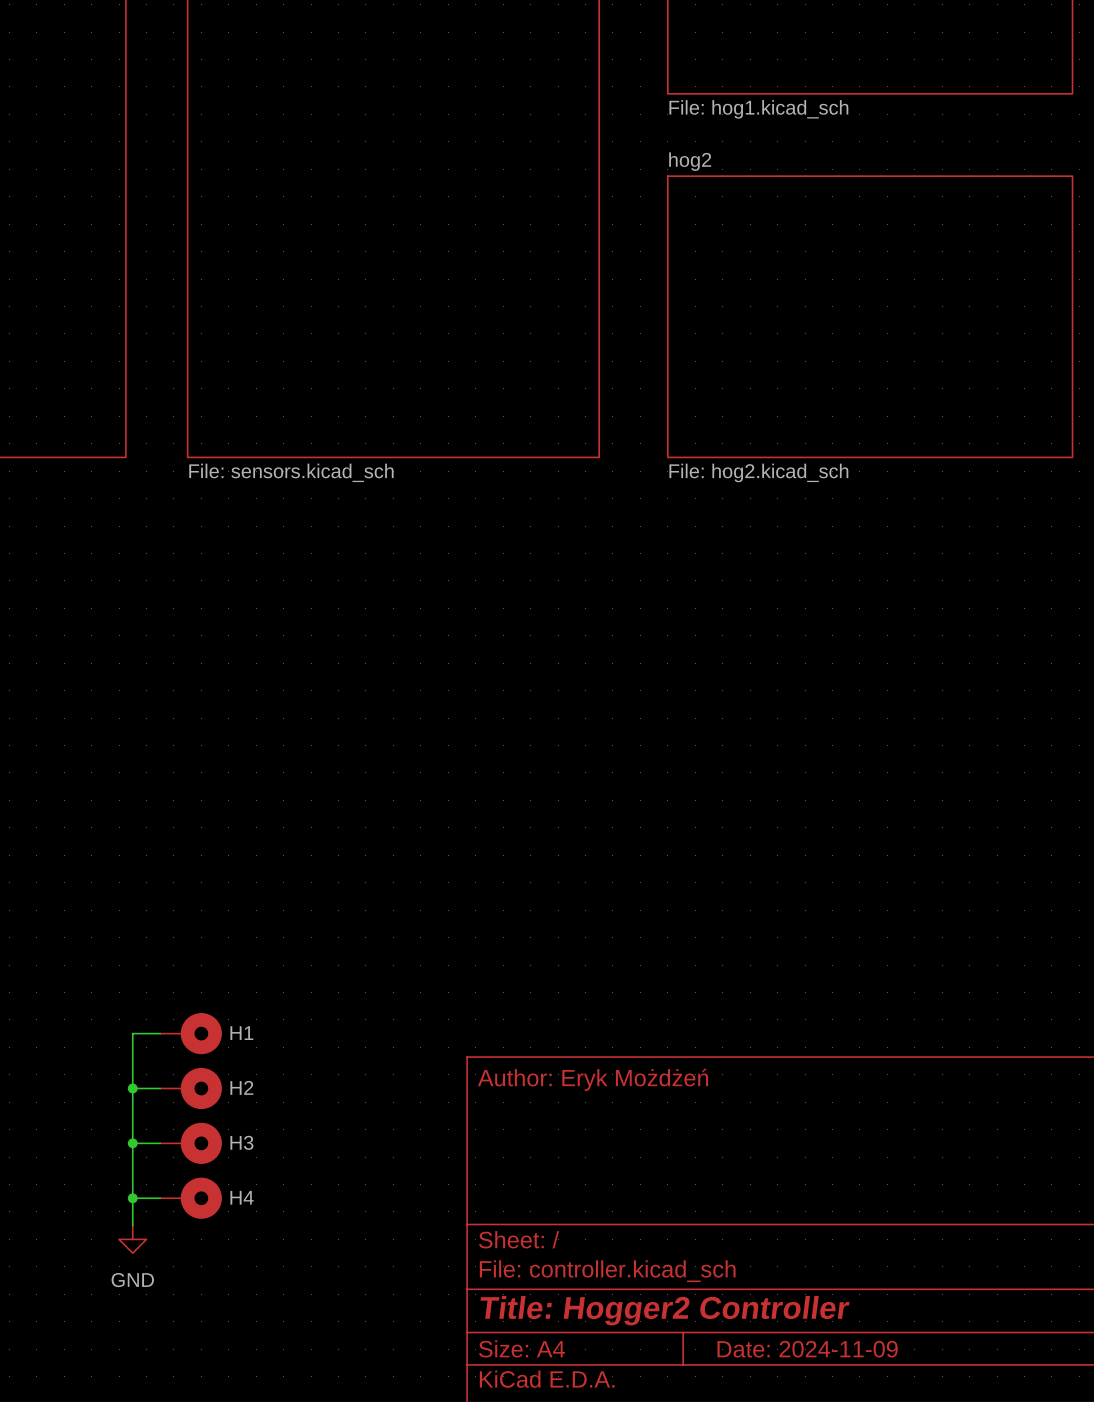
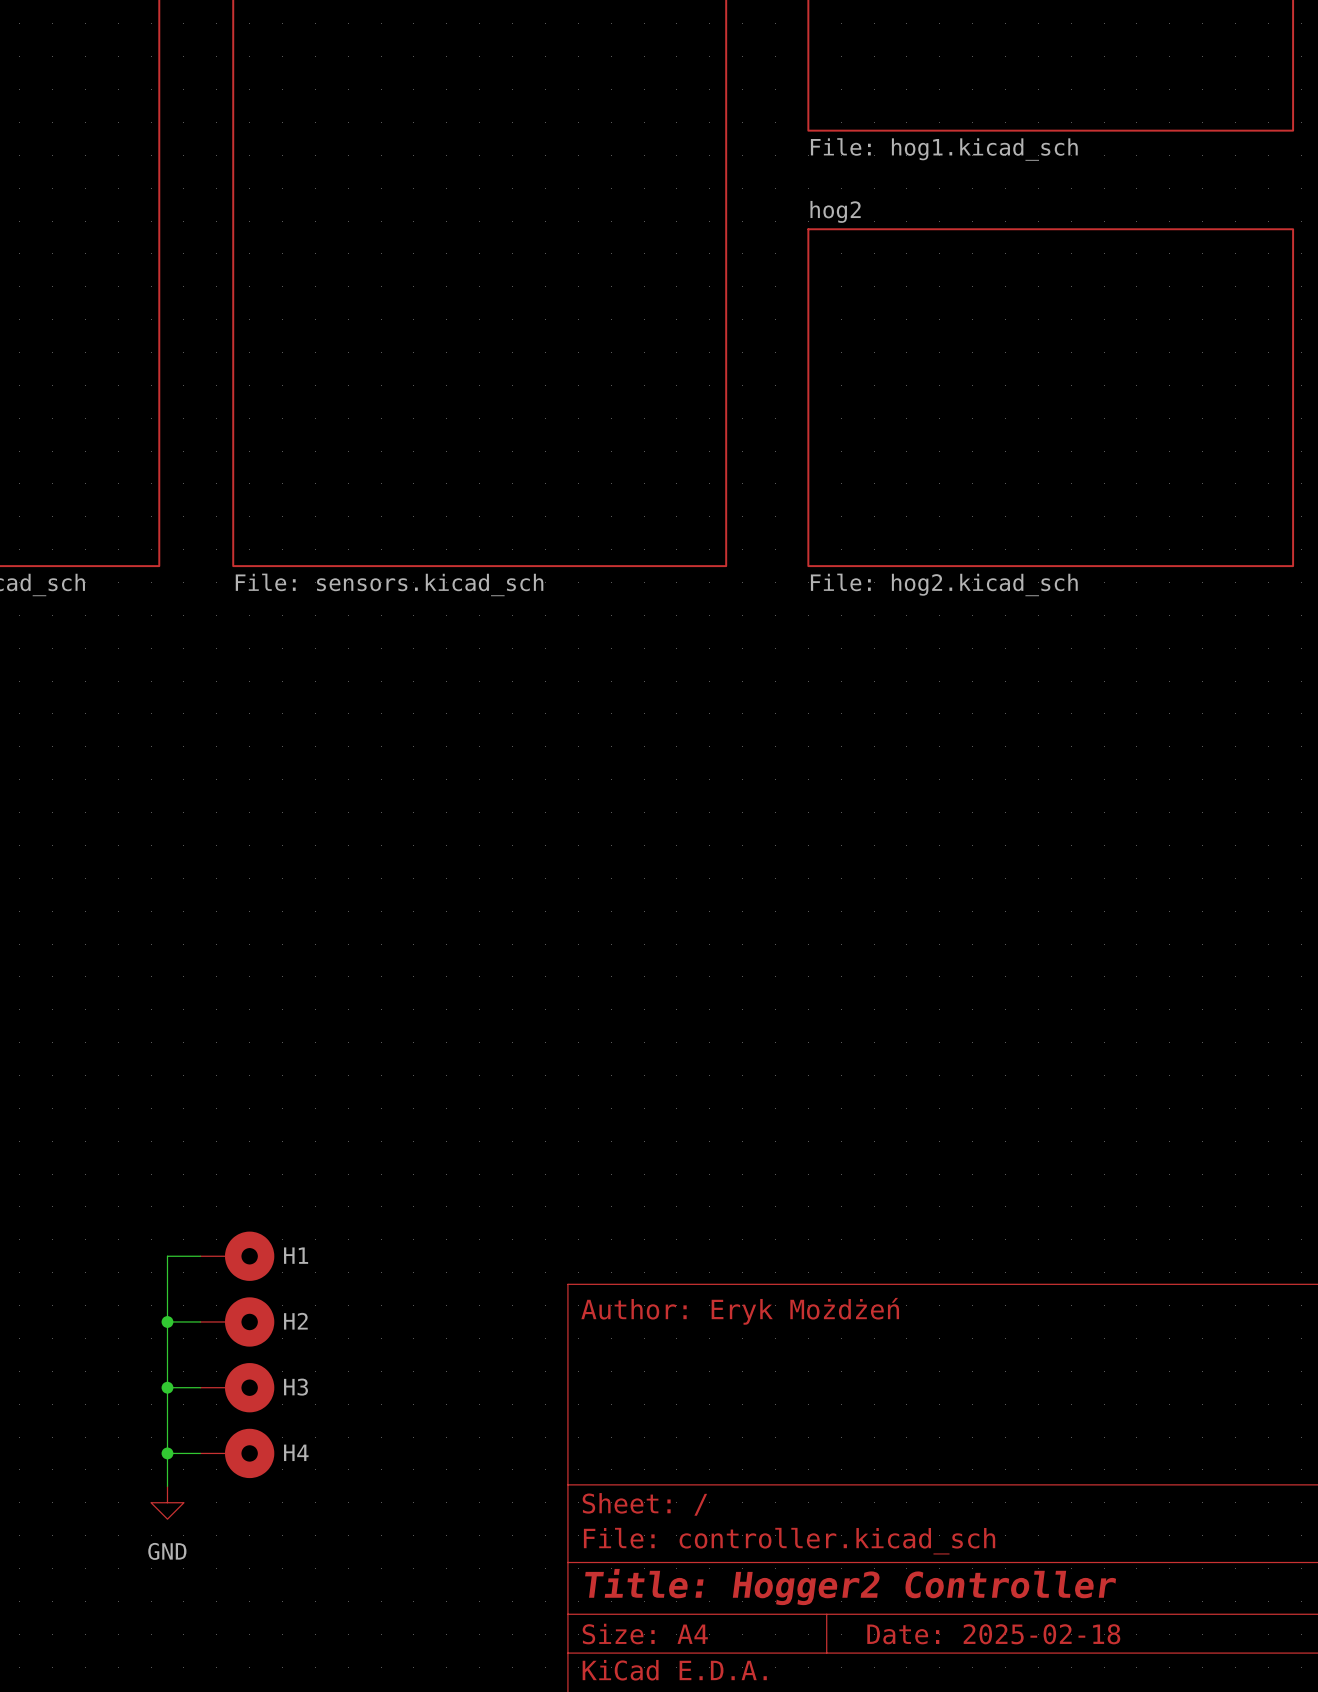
title block: Date: 2024-11-09 (807, 1349) -> Date: 2025-02-18 (993, 1634)

